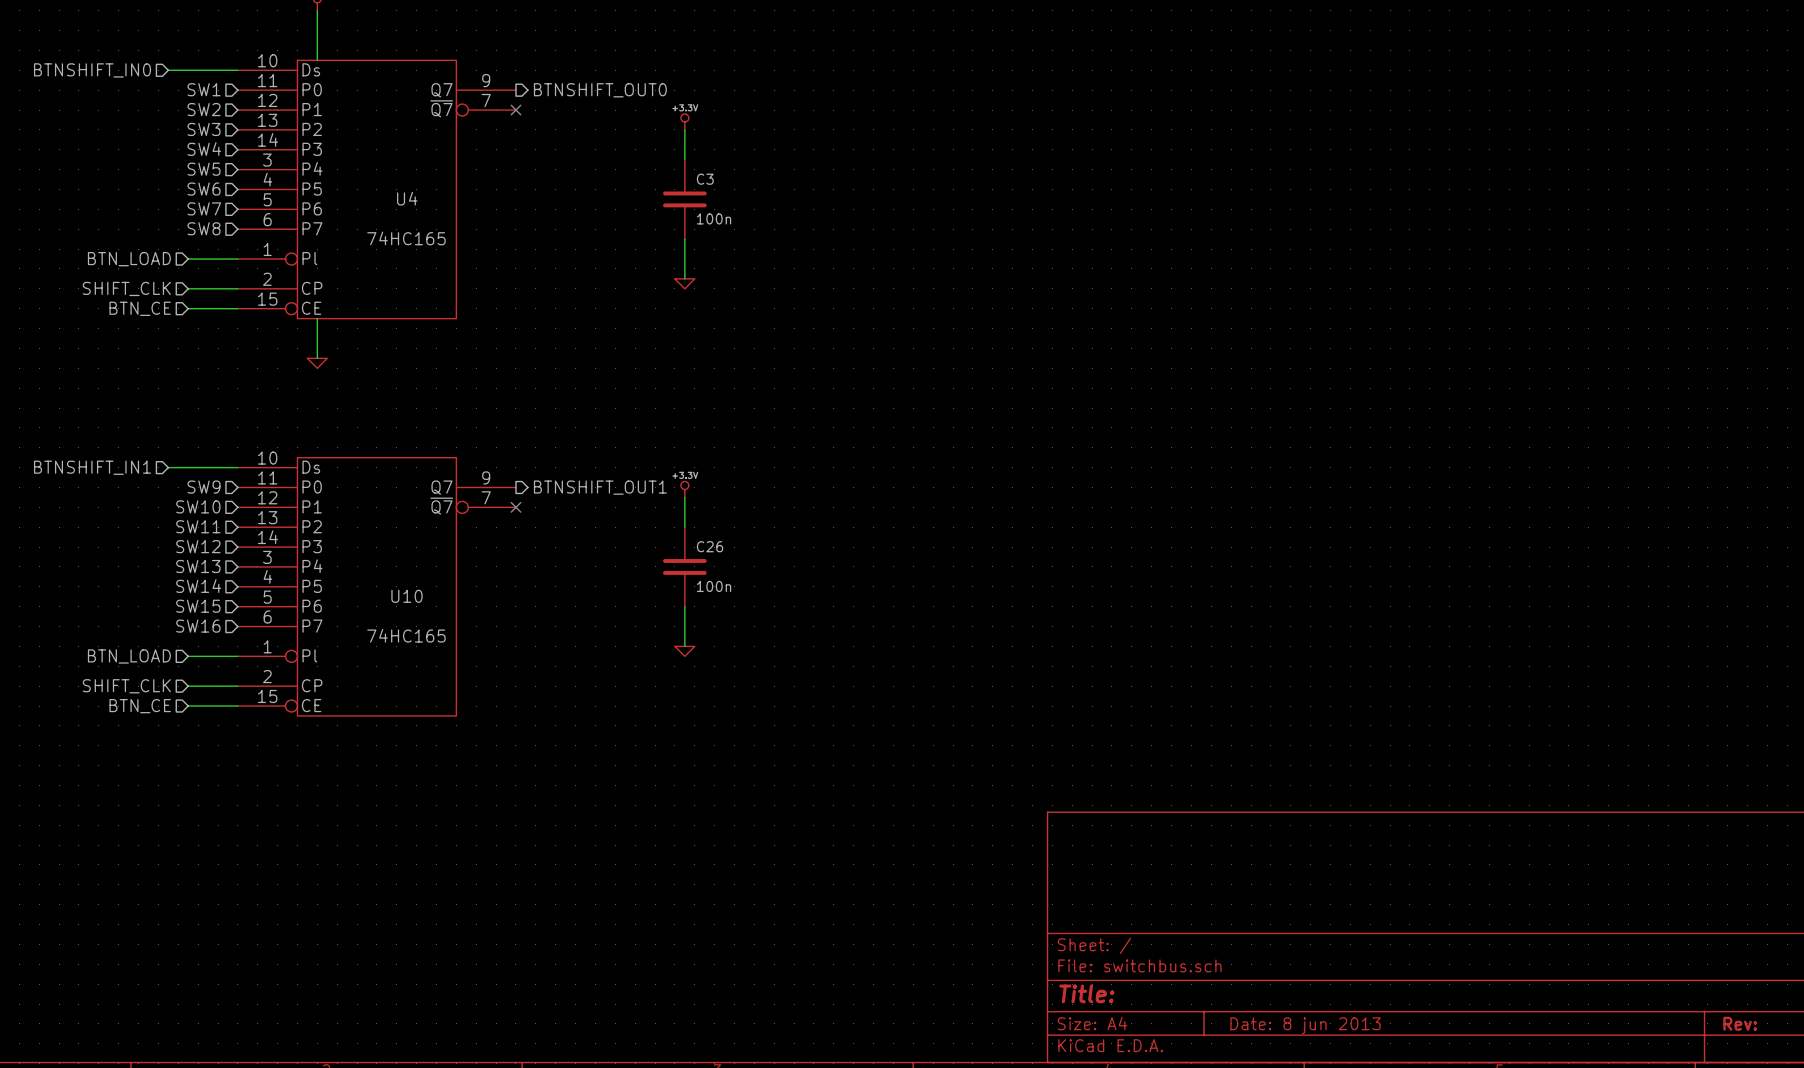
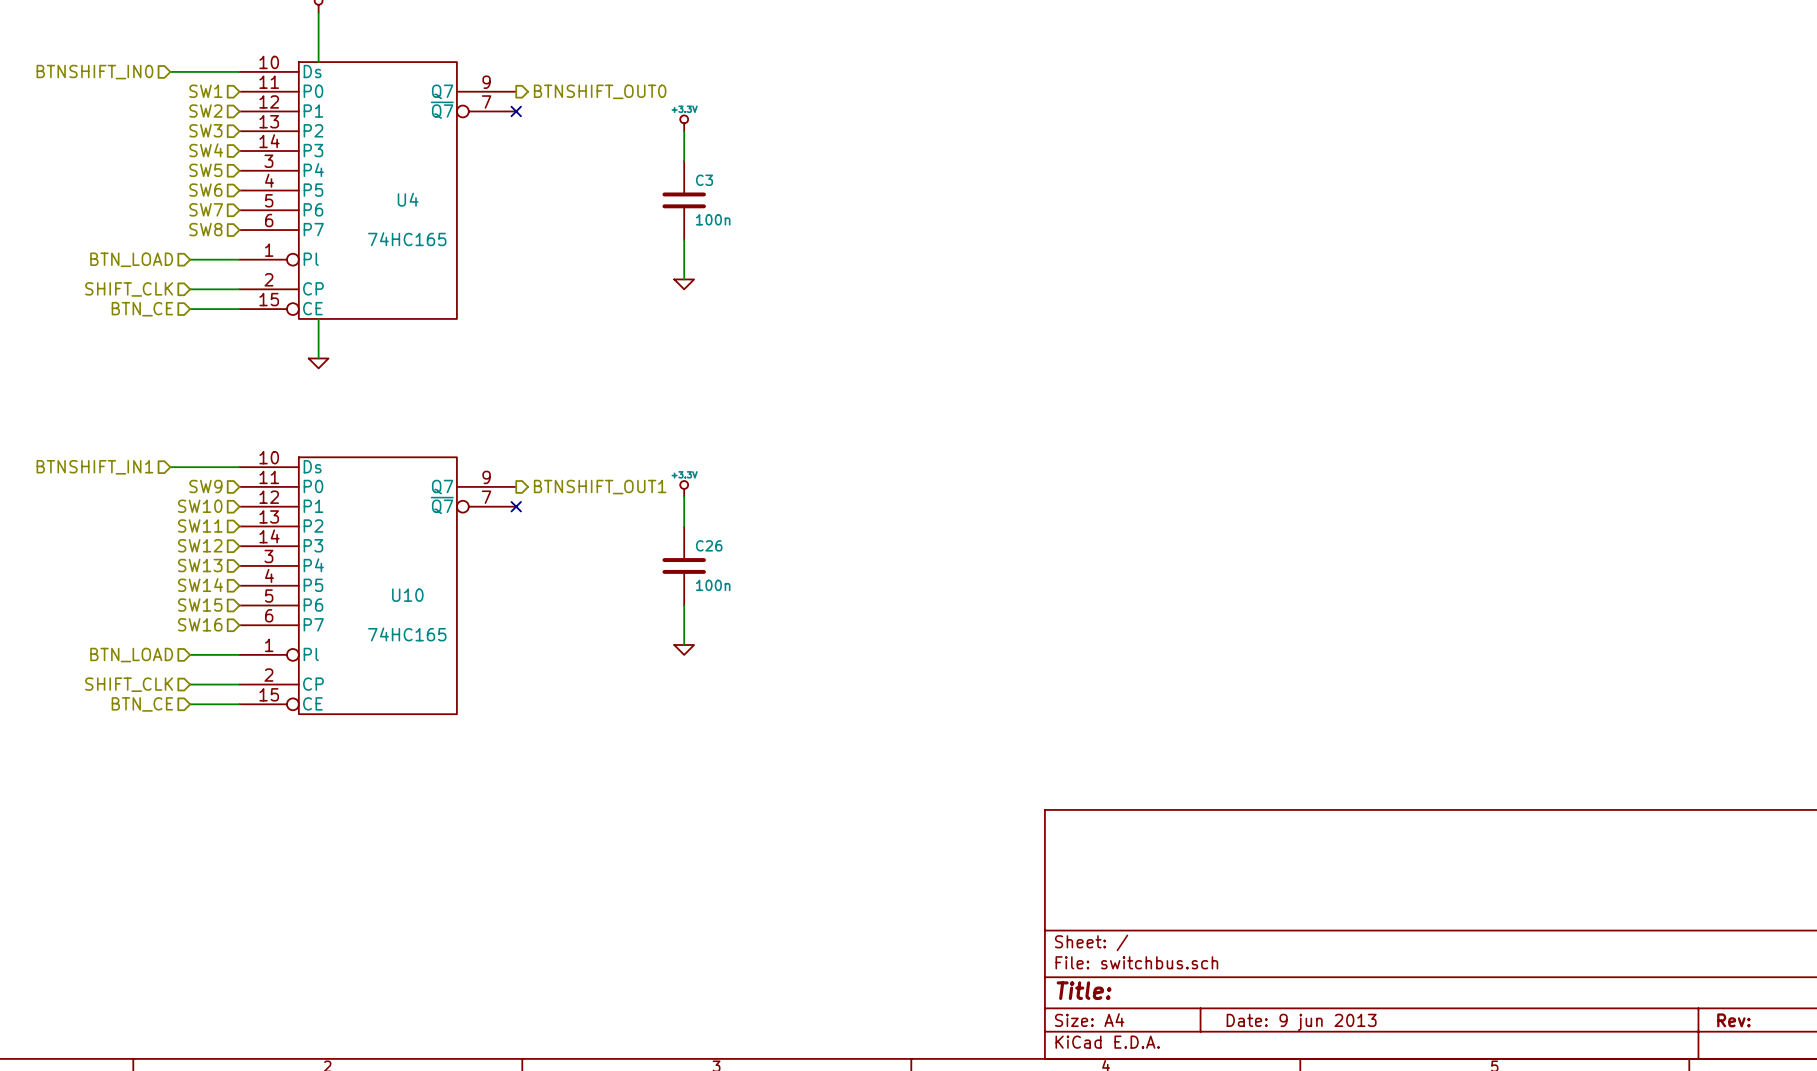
title block: Date: 8 jun 2013 (1305, 1025) -> Date: 9 jun 2013 (1301, 1022)

